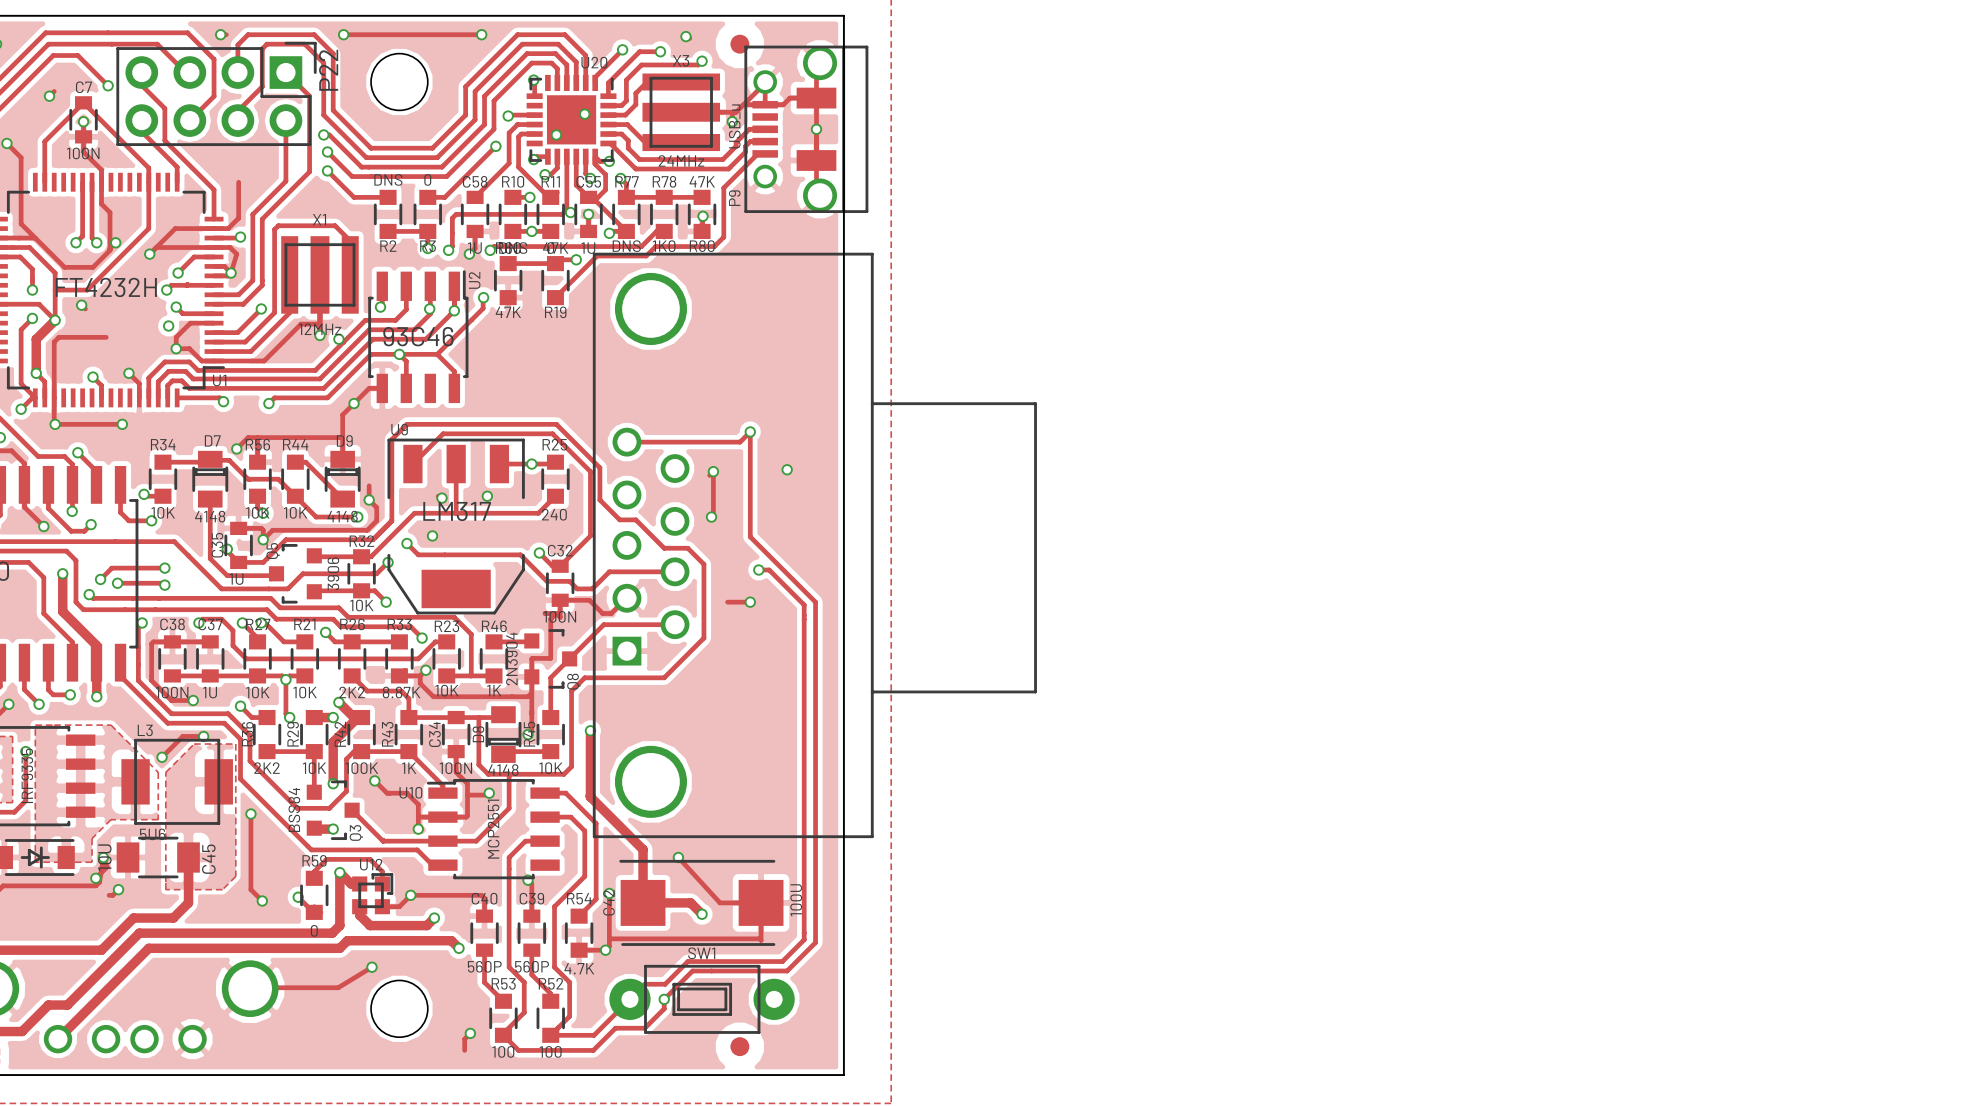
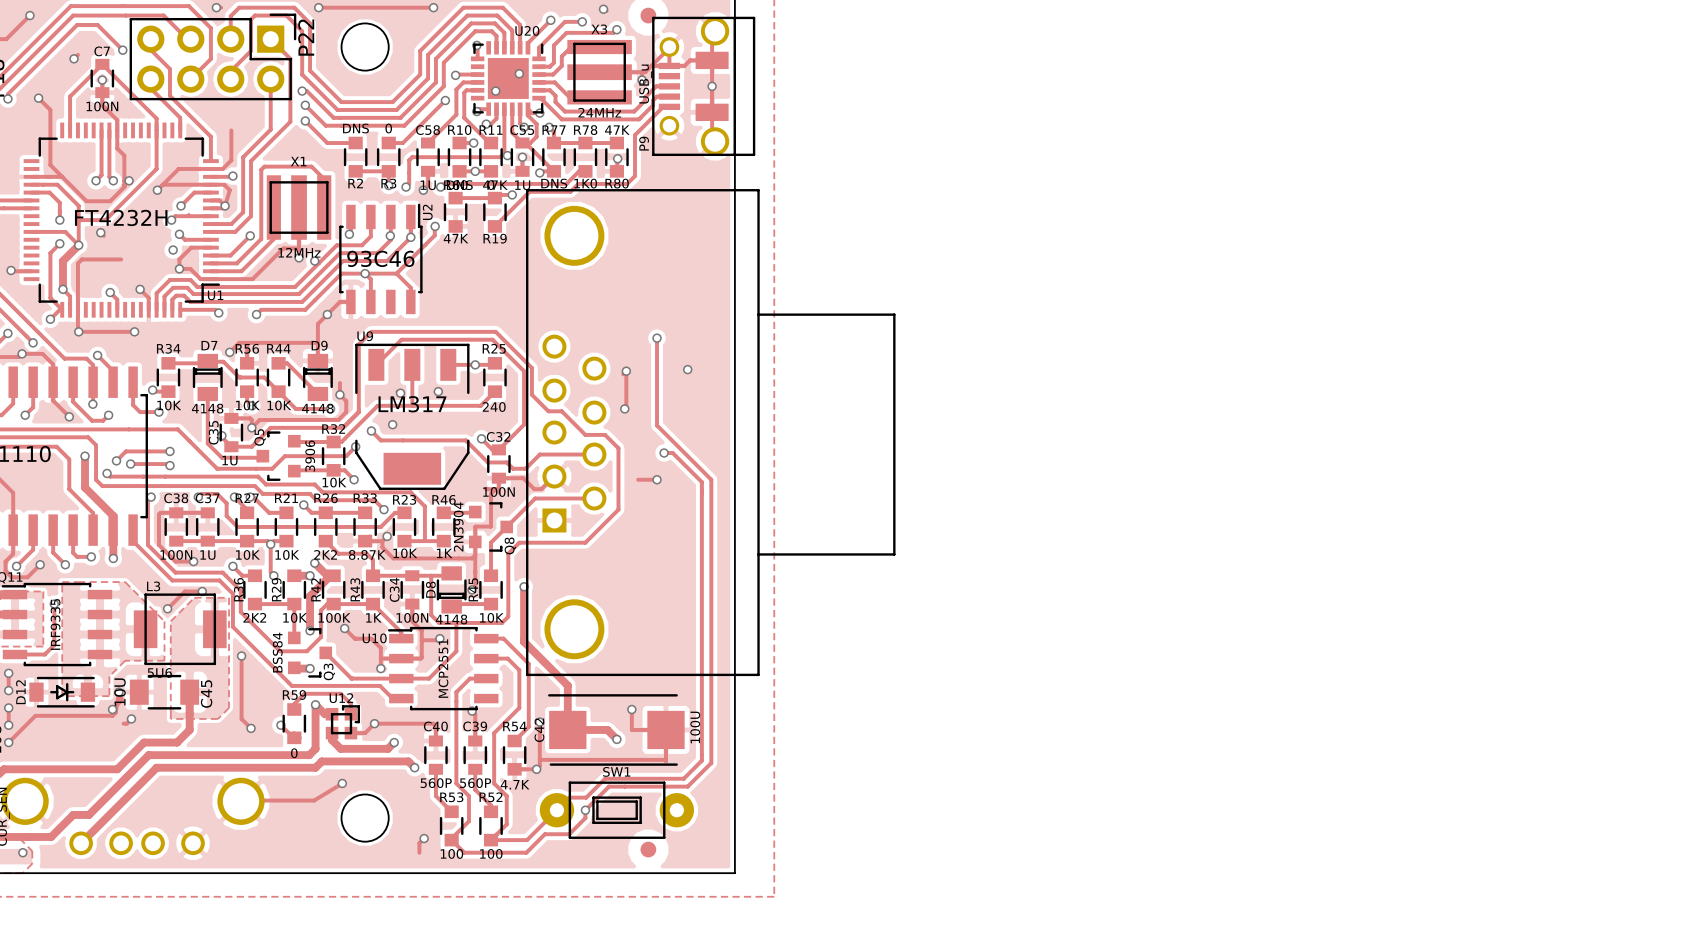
track: (750, 431) (740, 442) (626, 442) -> none
track: (678, 857) (720, 902) -> (631, 709) (631, 729)
via position: (678, 857) -> (631, 709)

